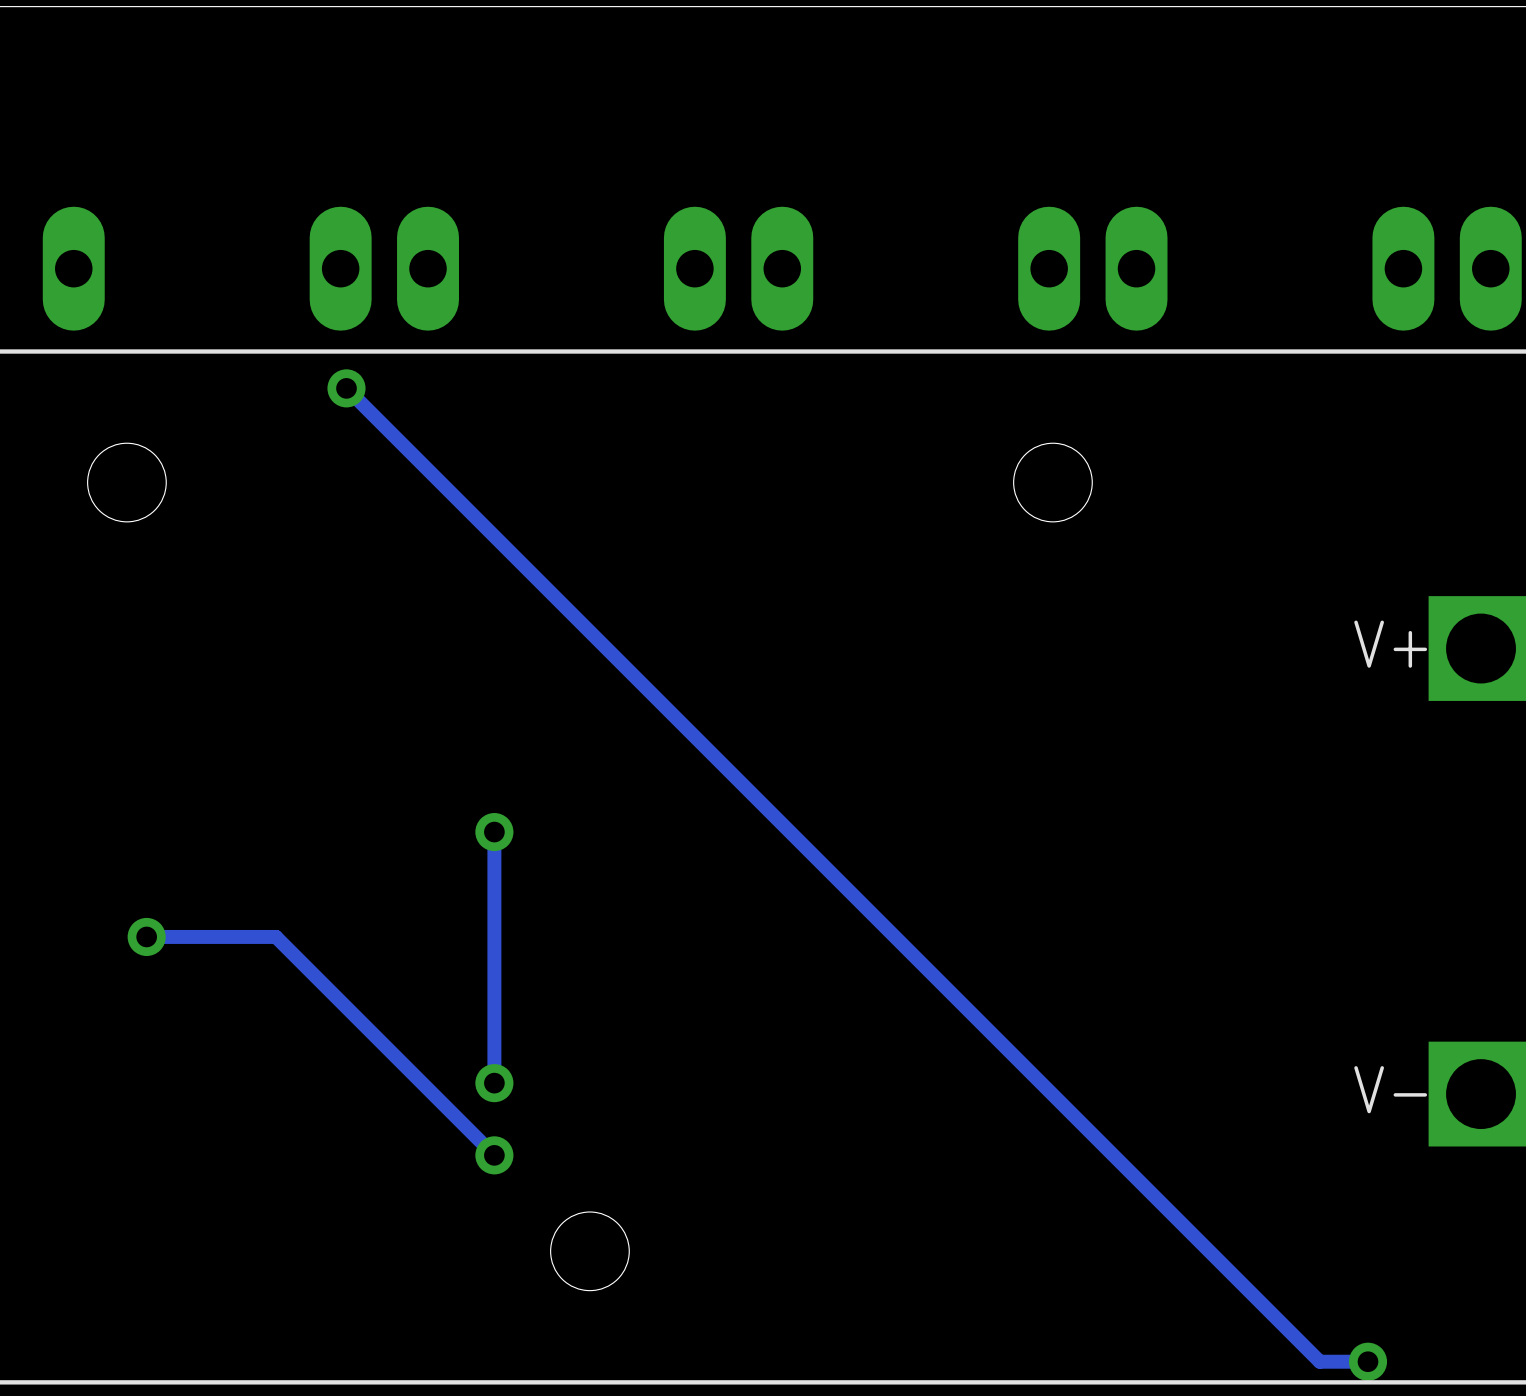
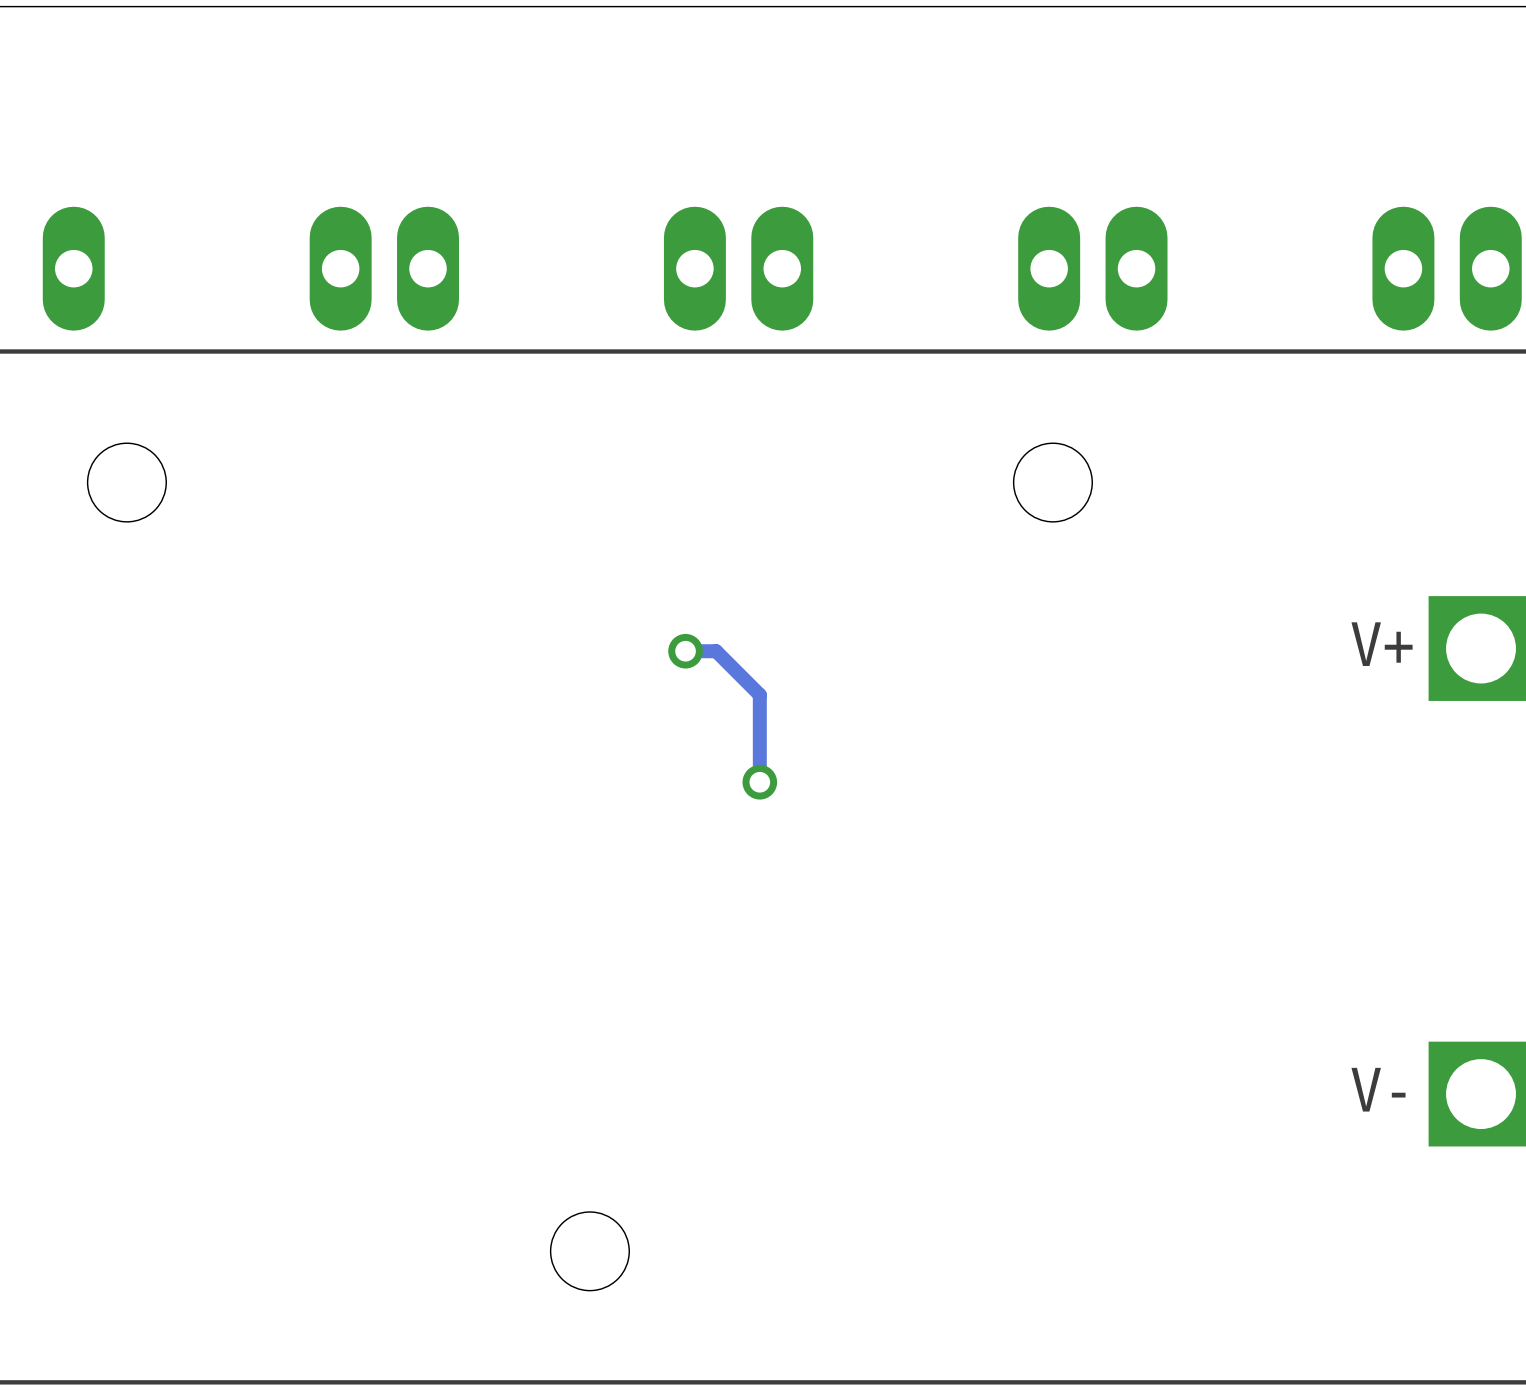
track: (346, 388) (1319, 1361) (1368, 1361) -> none
via: (346, 388) -> none
track: none -> (685, 651) (716, 651) (759, 694) (759, 782)
via: none -> (685, 651)
via: none -> (759, 782)
track: (494, 832) (494, 1083) -> none
via: (494, 832) -> none
track: (146, 936) (275, 936) (494, 1155) -> none
via: (146, 936) -> none
via: (494, 1083) -> none
via: (494, 1155) -> none
via: (1368, 1361) -> none

